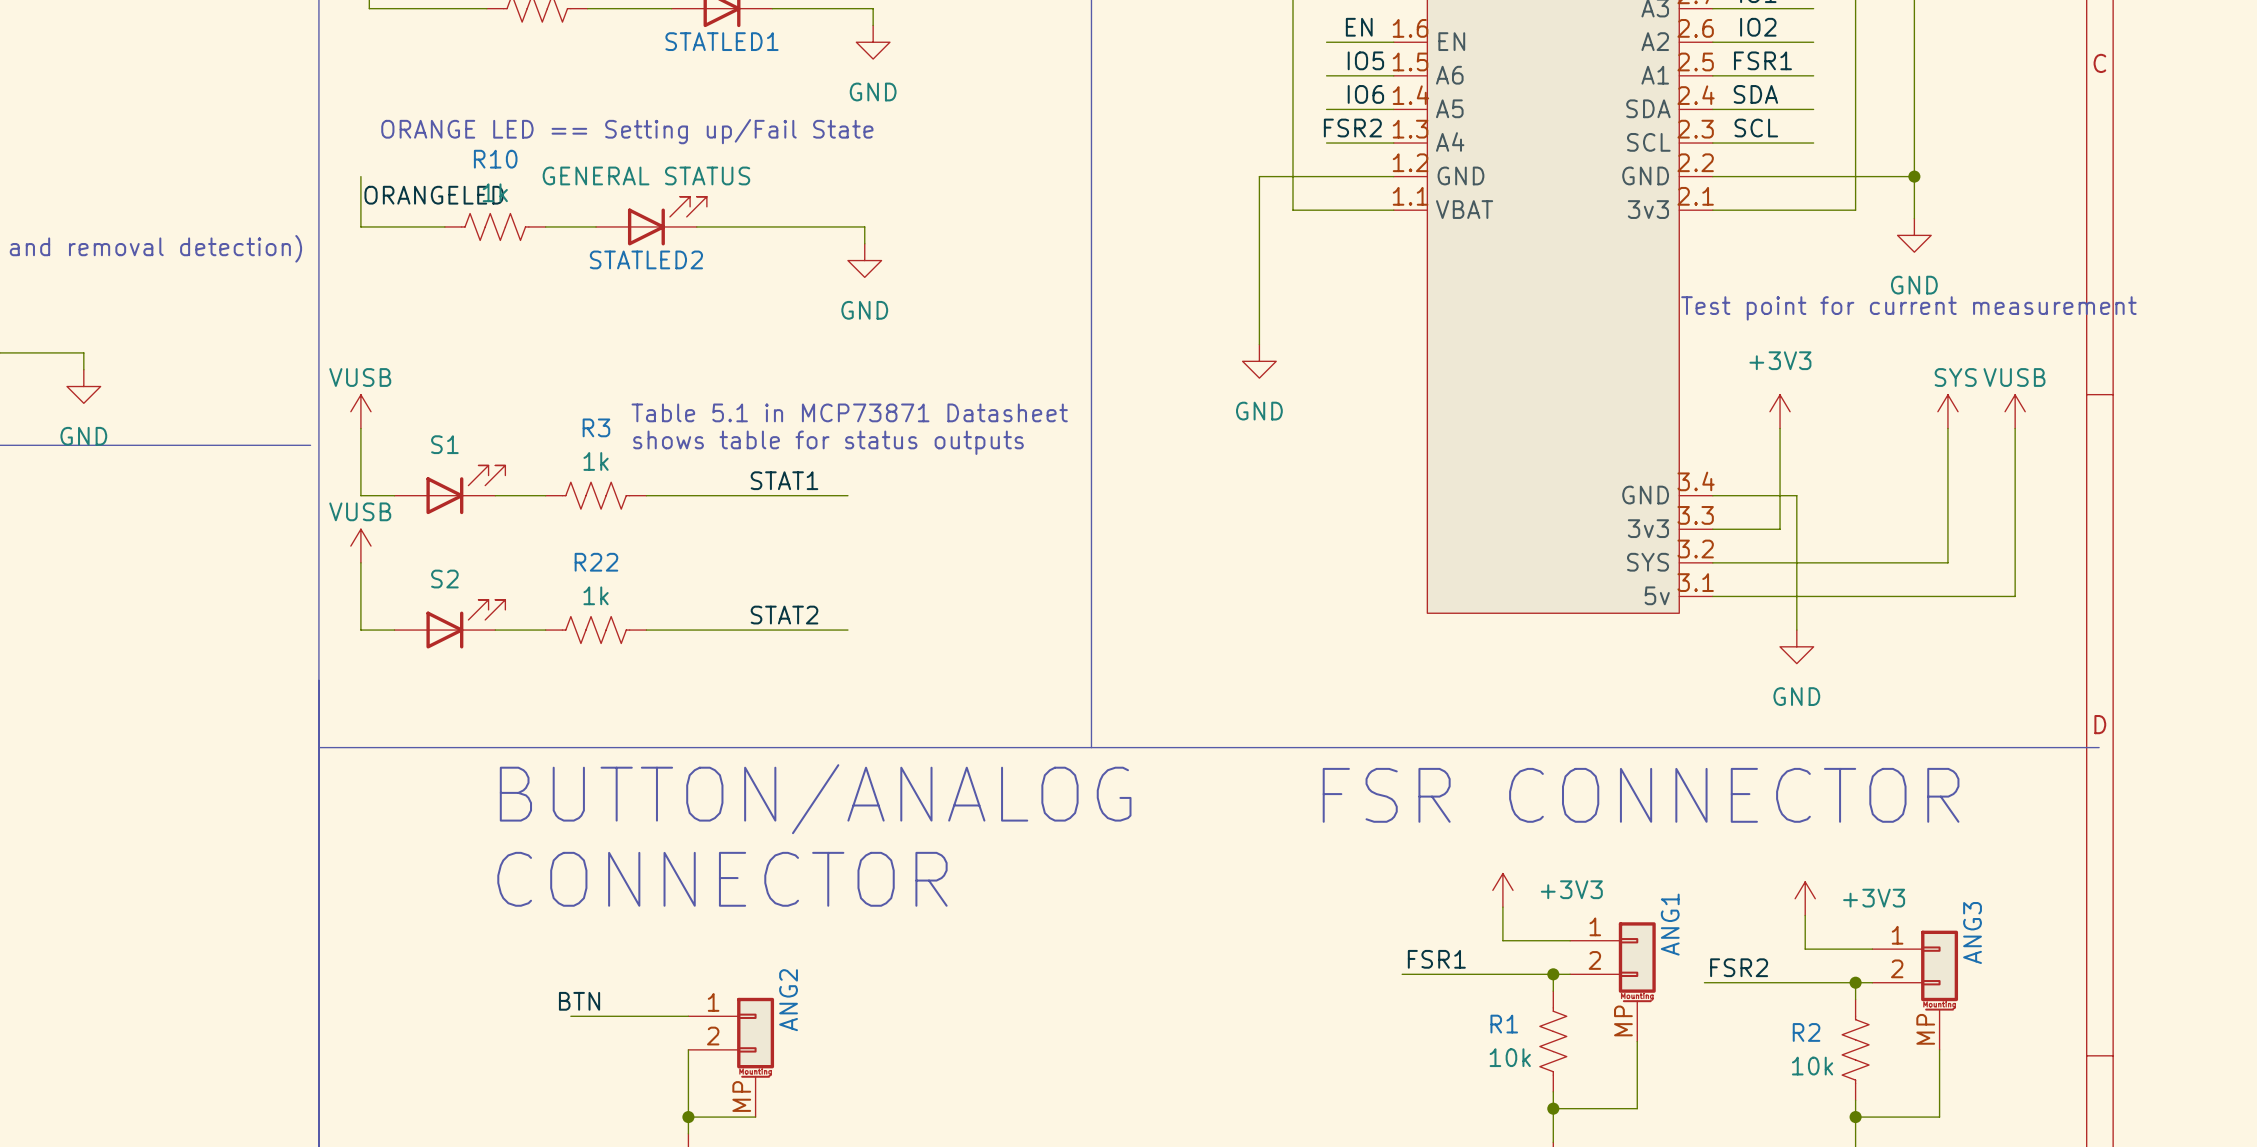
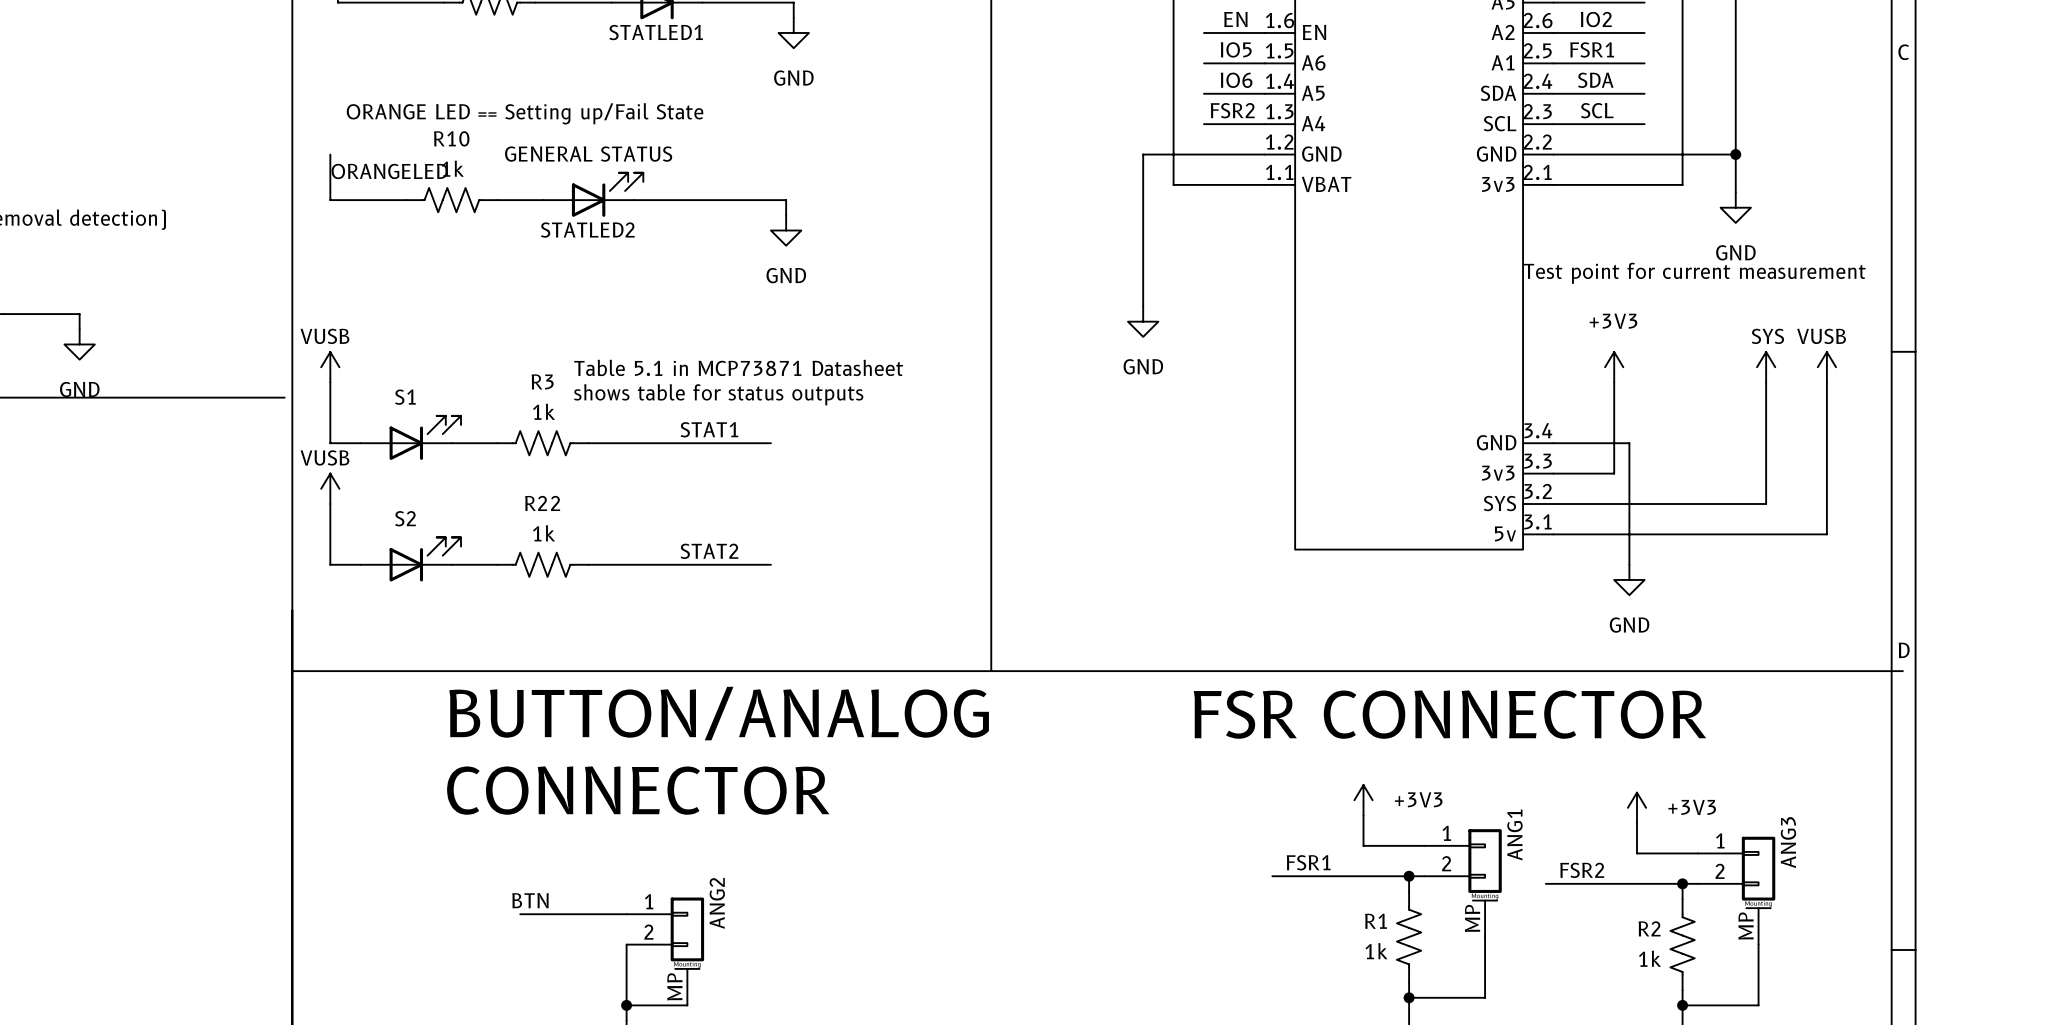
R1 name position: R1 (1504, 1024) -> R1 (1376, 921)
R2 name position: R2 (1806, 1032) -> R2 (1649, 928)
R1 value: 10k (1510, 1057) -> 1k (1376, 951)
R2 value: 10k (1812, 1066) -> 1k (1649, 958)

